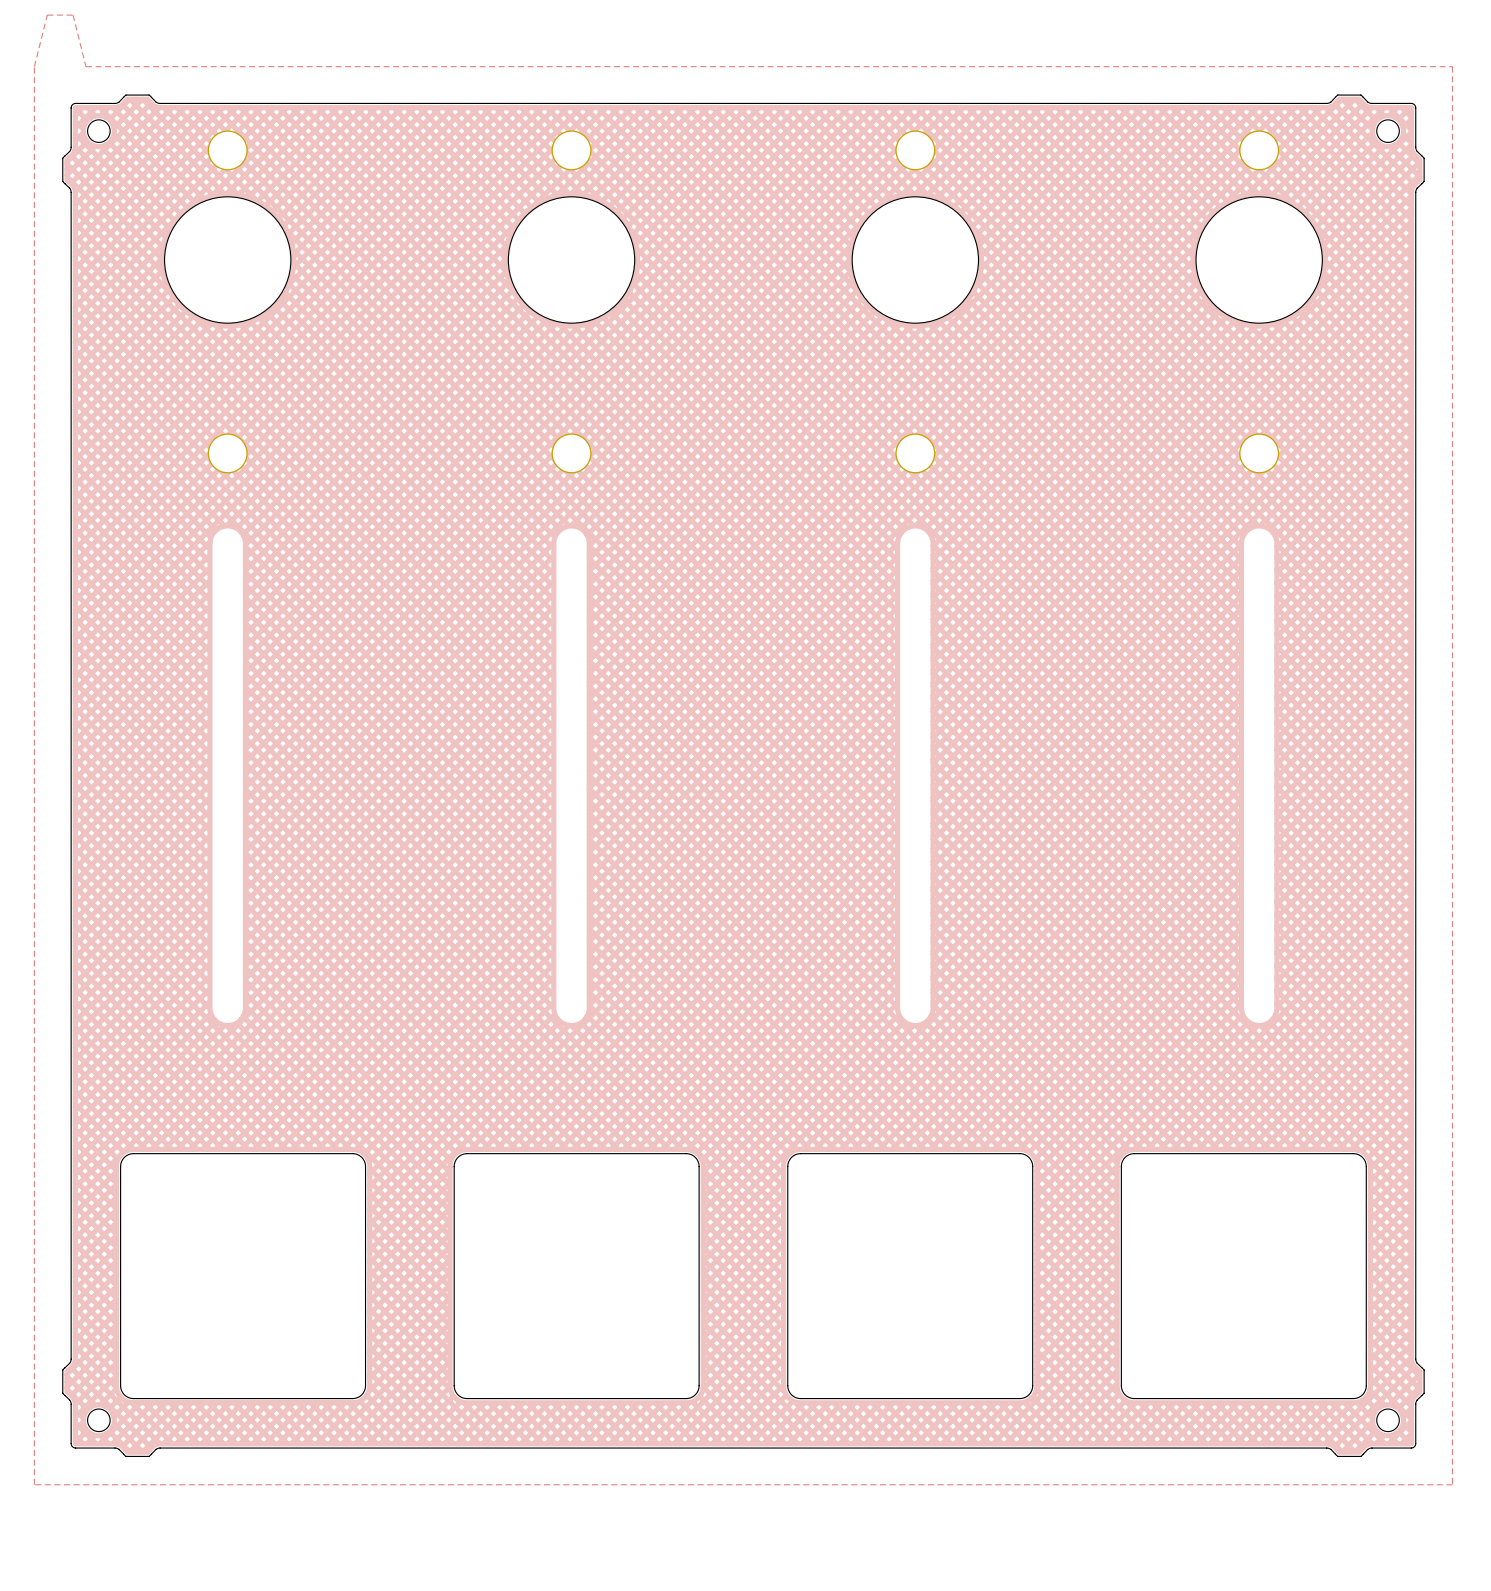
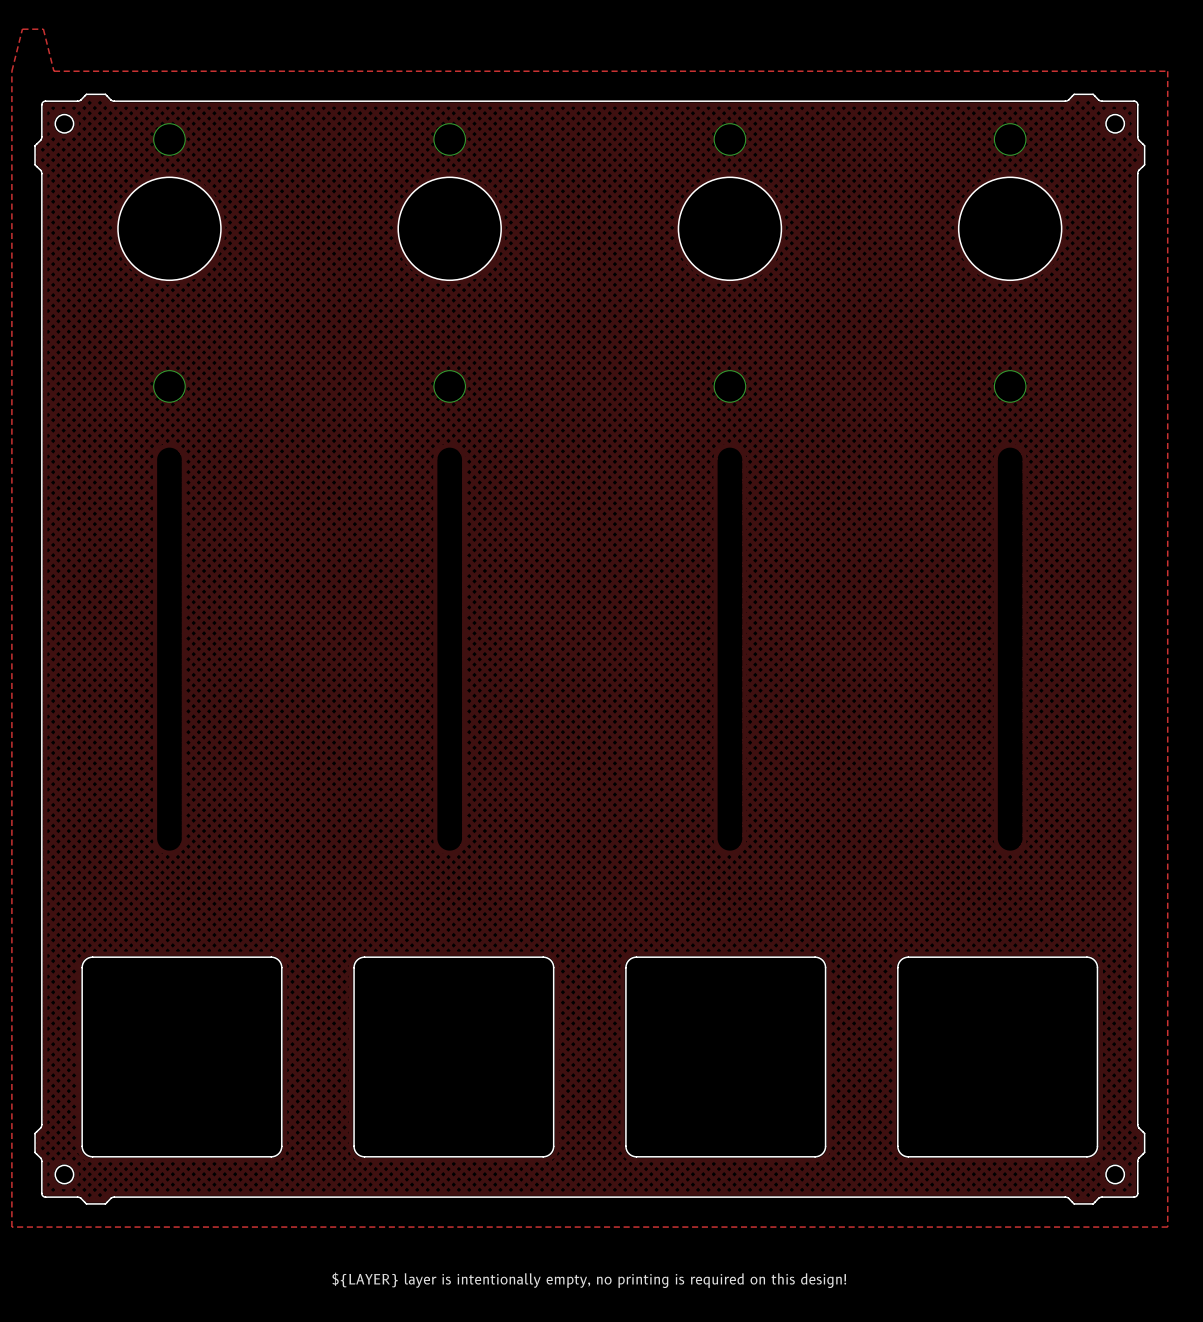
text: none -> ${LAYER} layer is intentionally empty, no printing is required on this design! (589, 1280)

